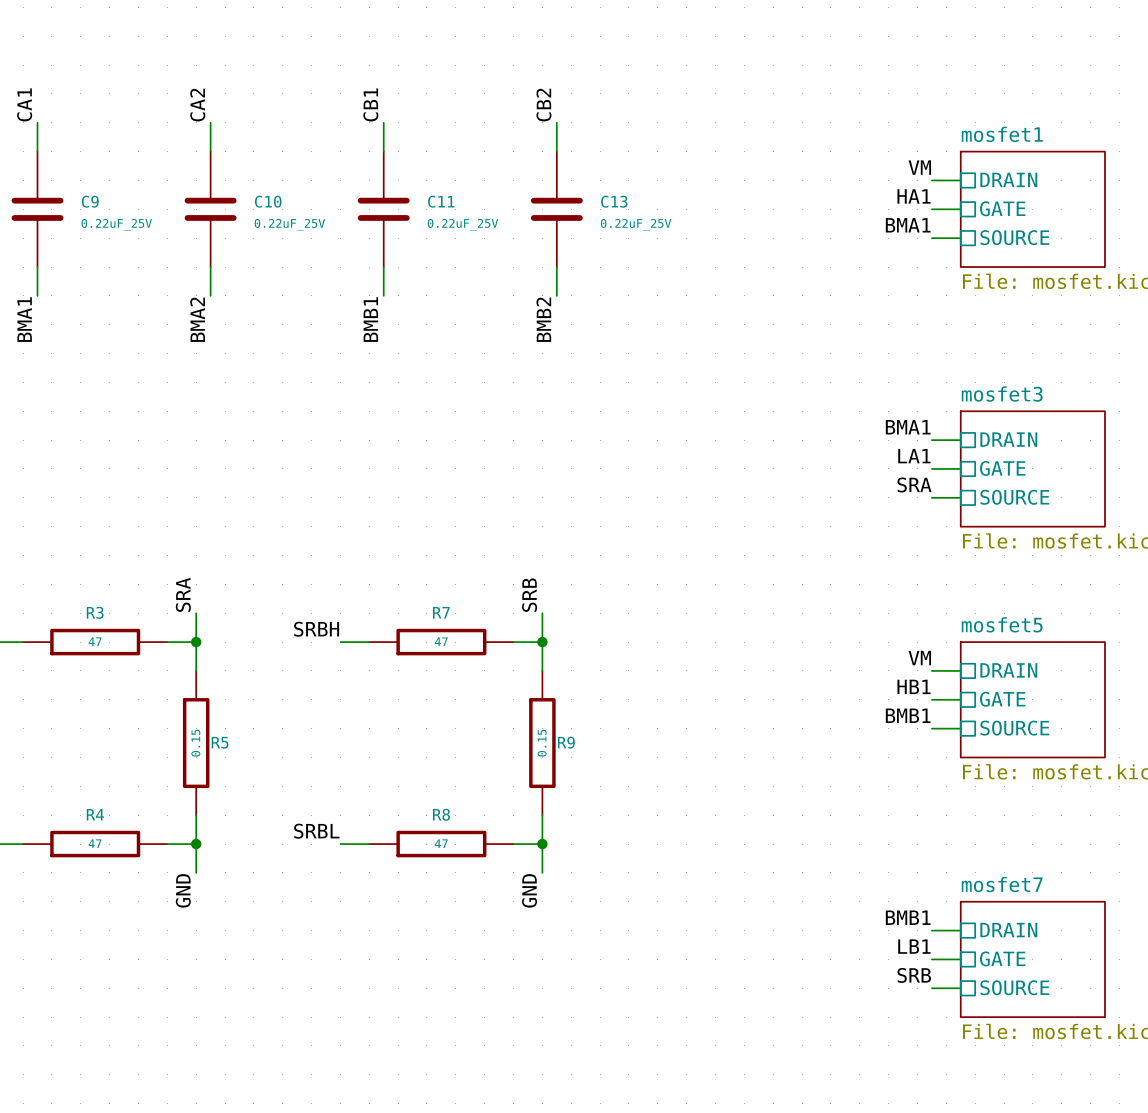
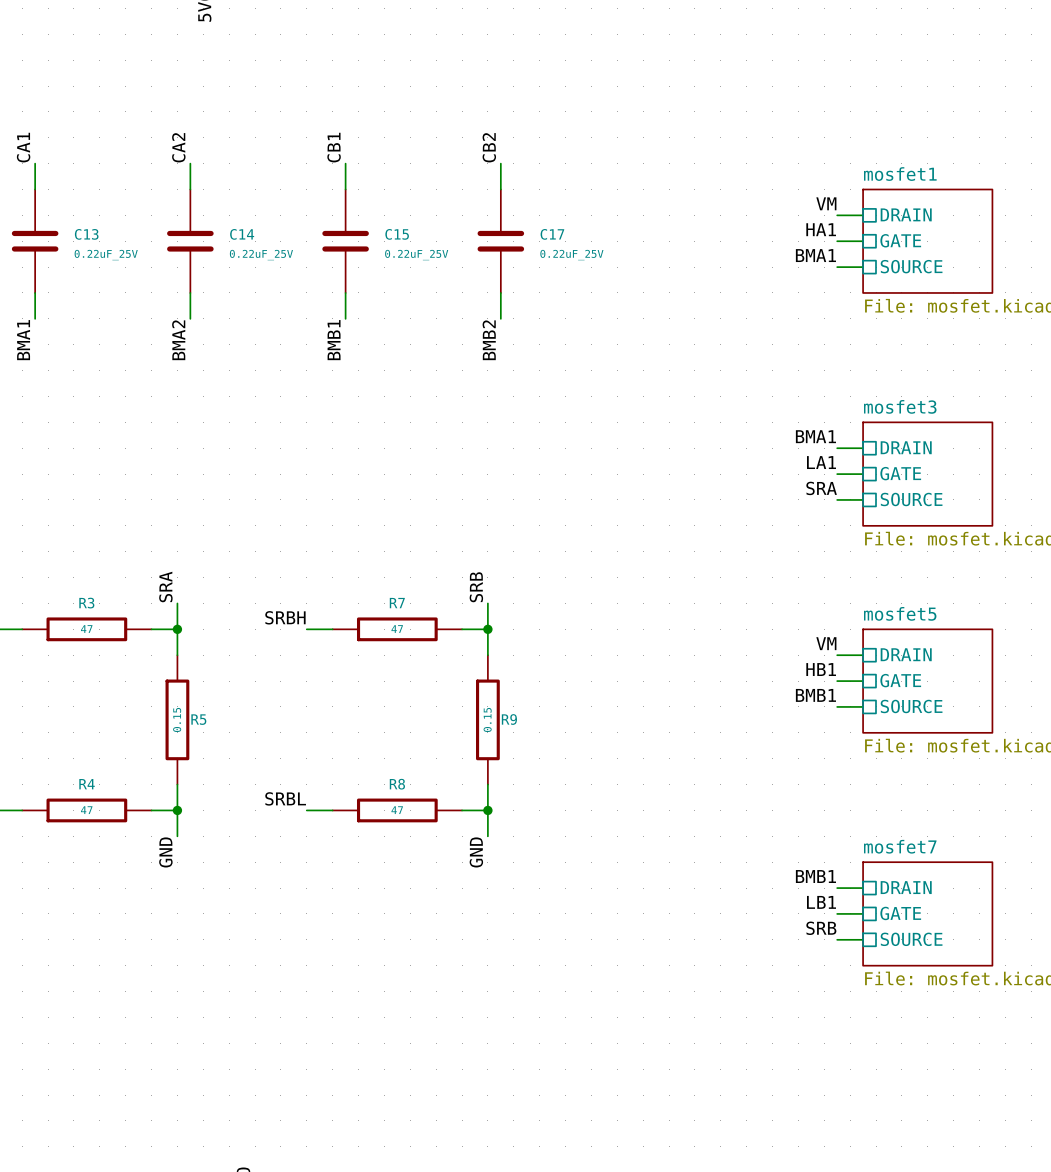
C9 name: C9 (90, 201) -> C13 (86, 234)
C10 name: C10 (268, 201) -> C14 (242, 234)
C11 name: C11 (441, 201) -> C15 (397, 234)
C13 name: C13 (614, 201) -> C17 (552, 234)

